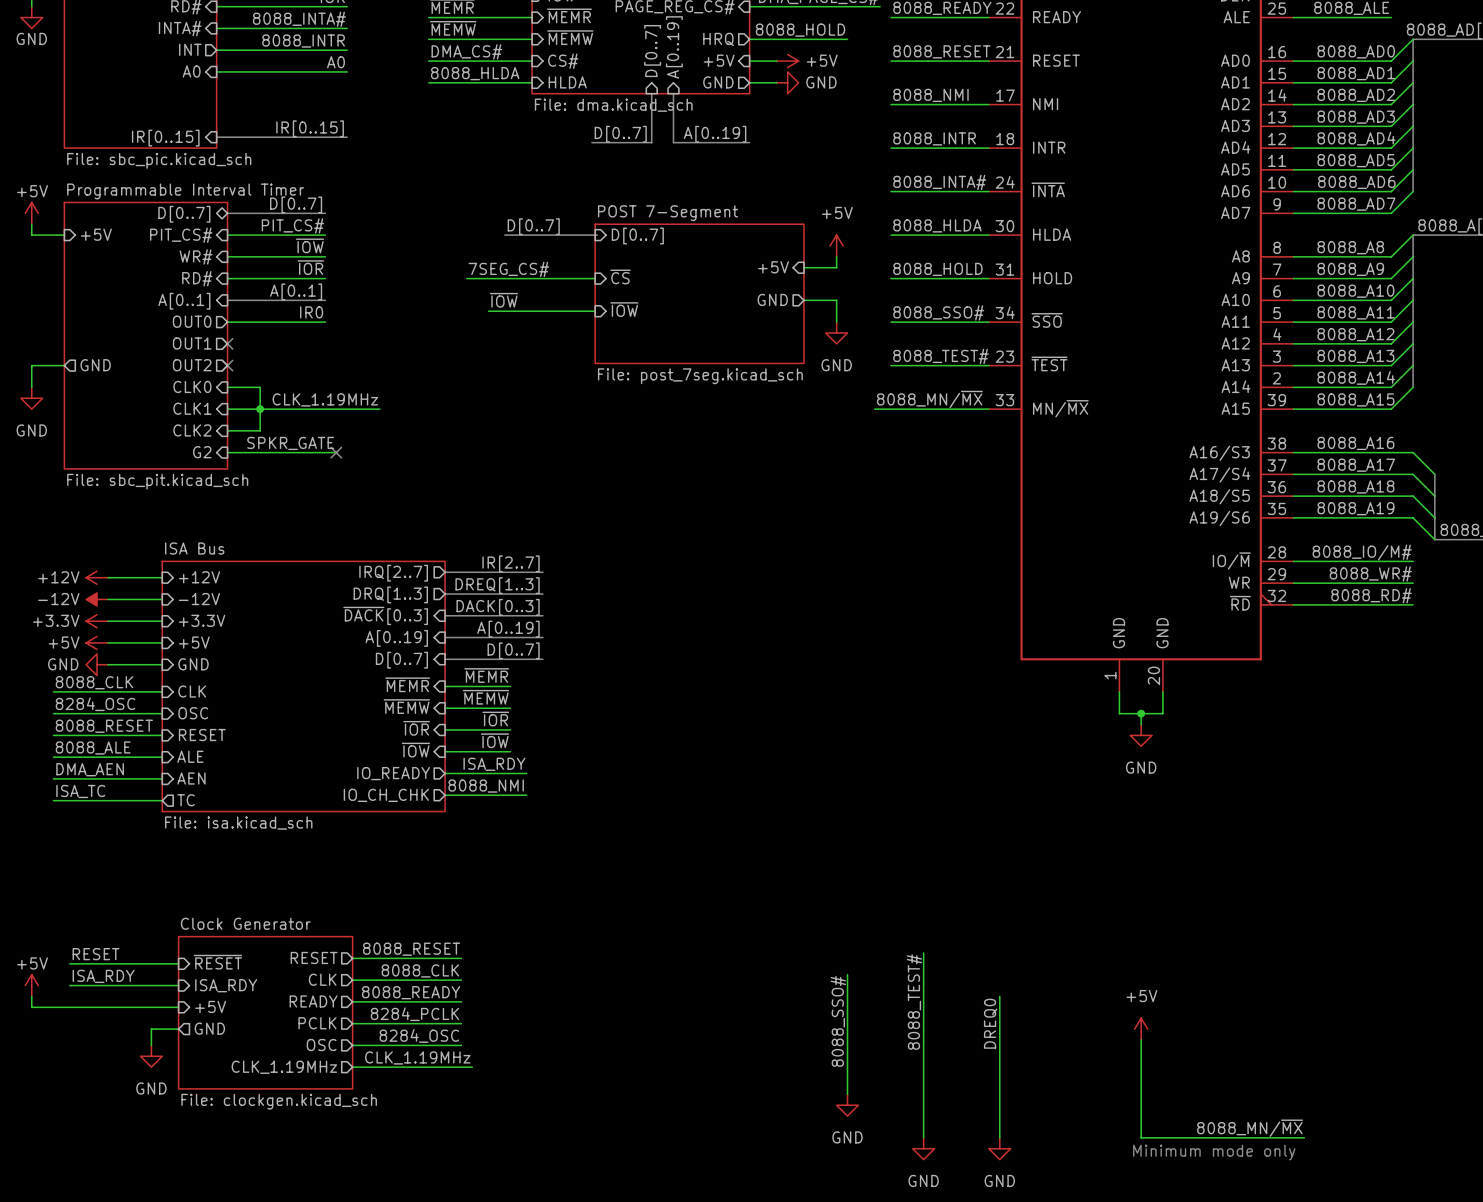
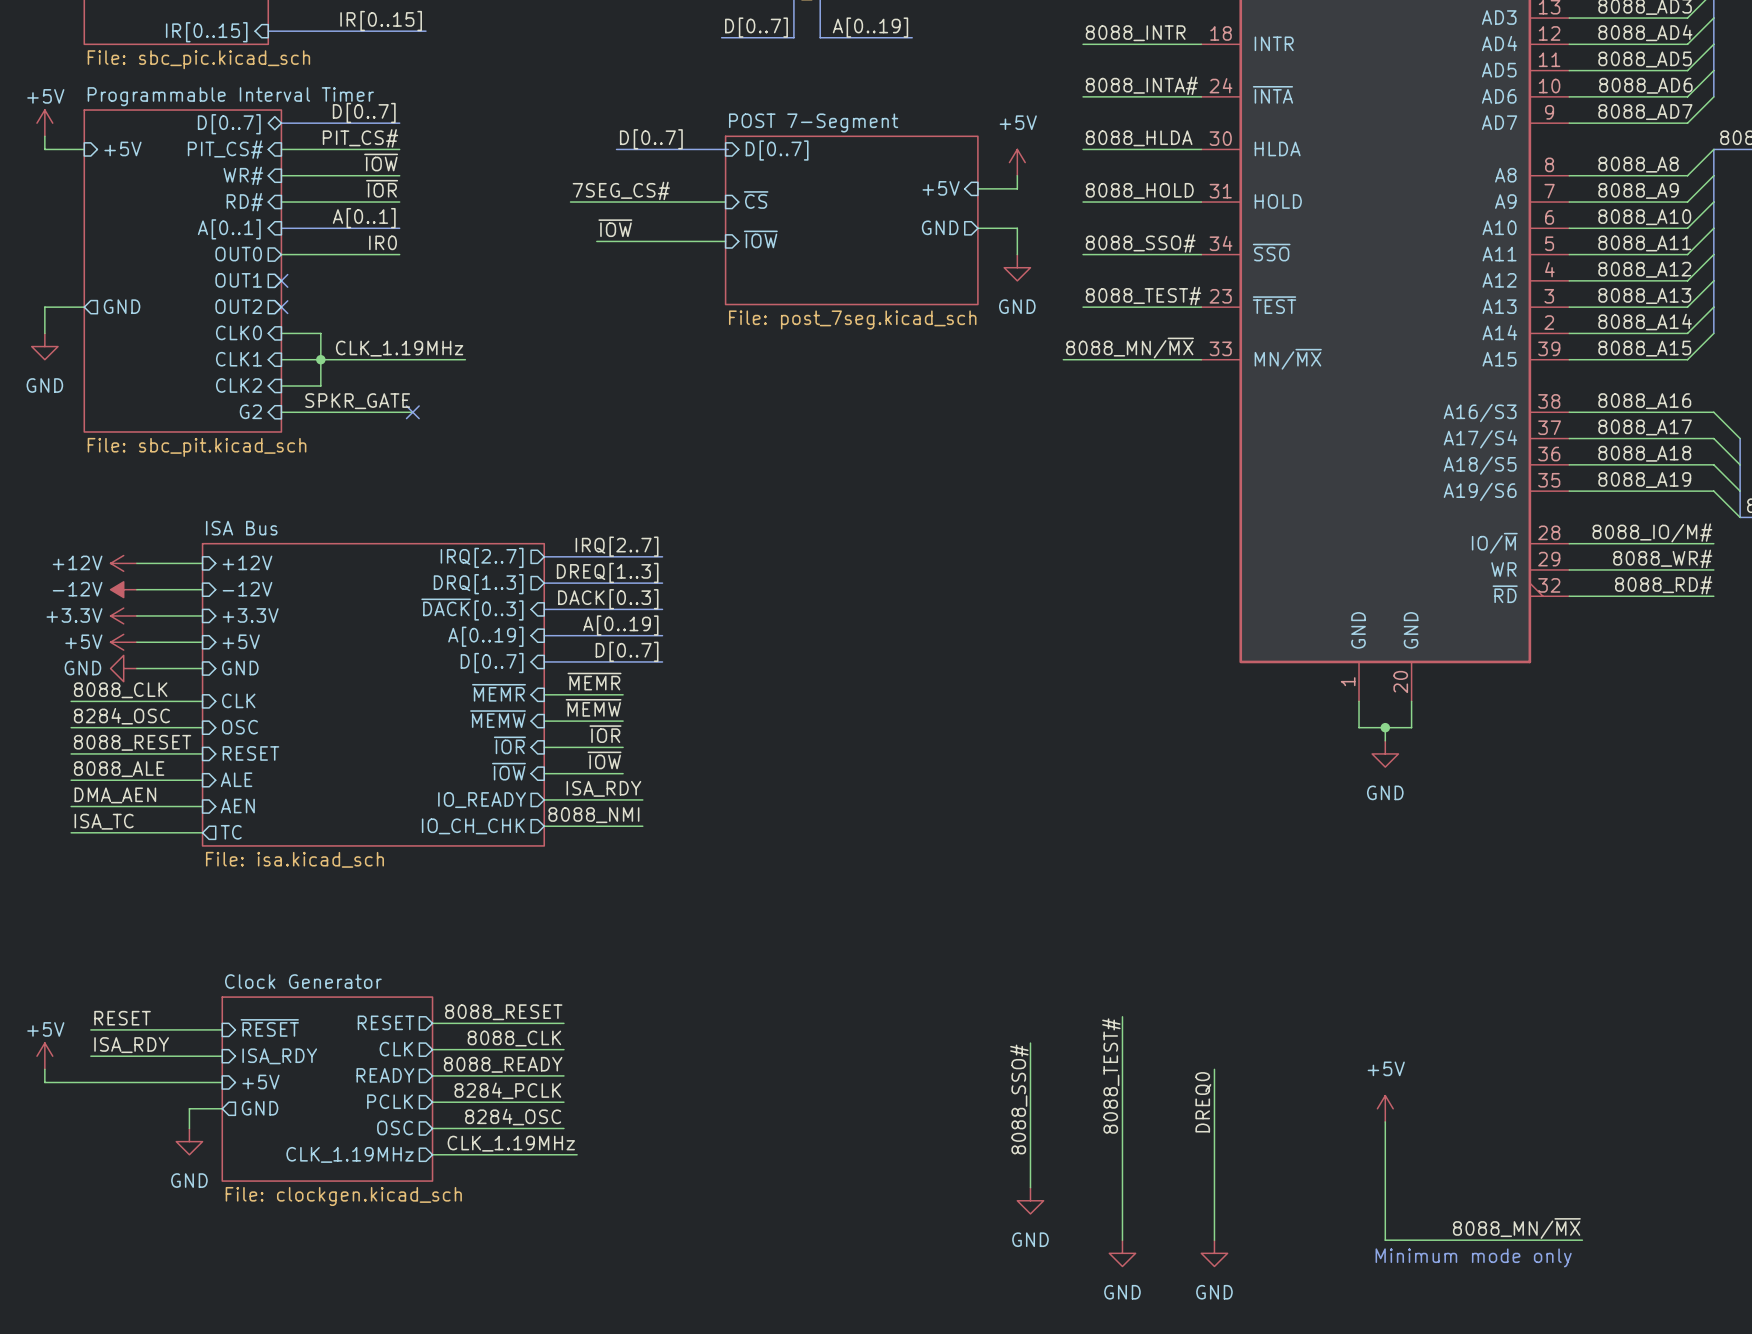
label: IR[2..7] (511, 563) -> IRQ[2..7] (617, 546)

